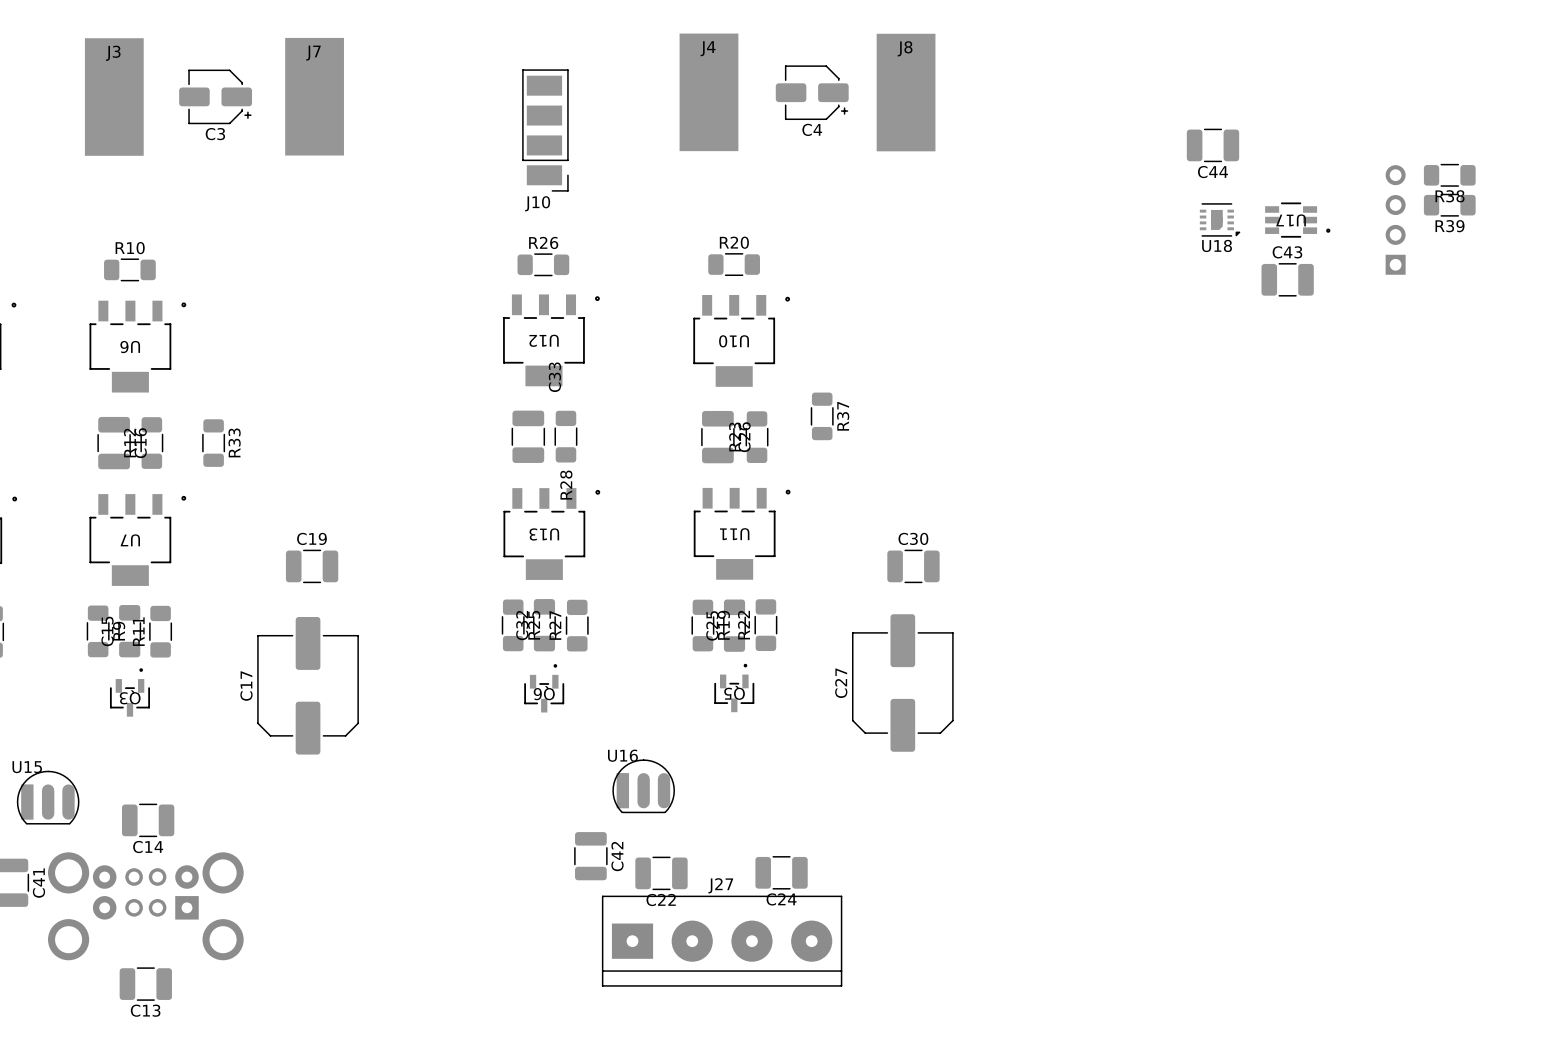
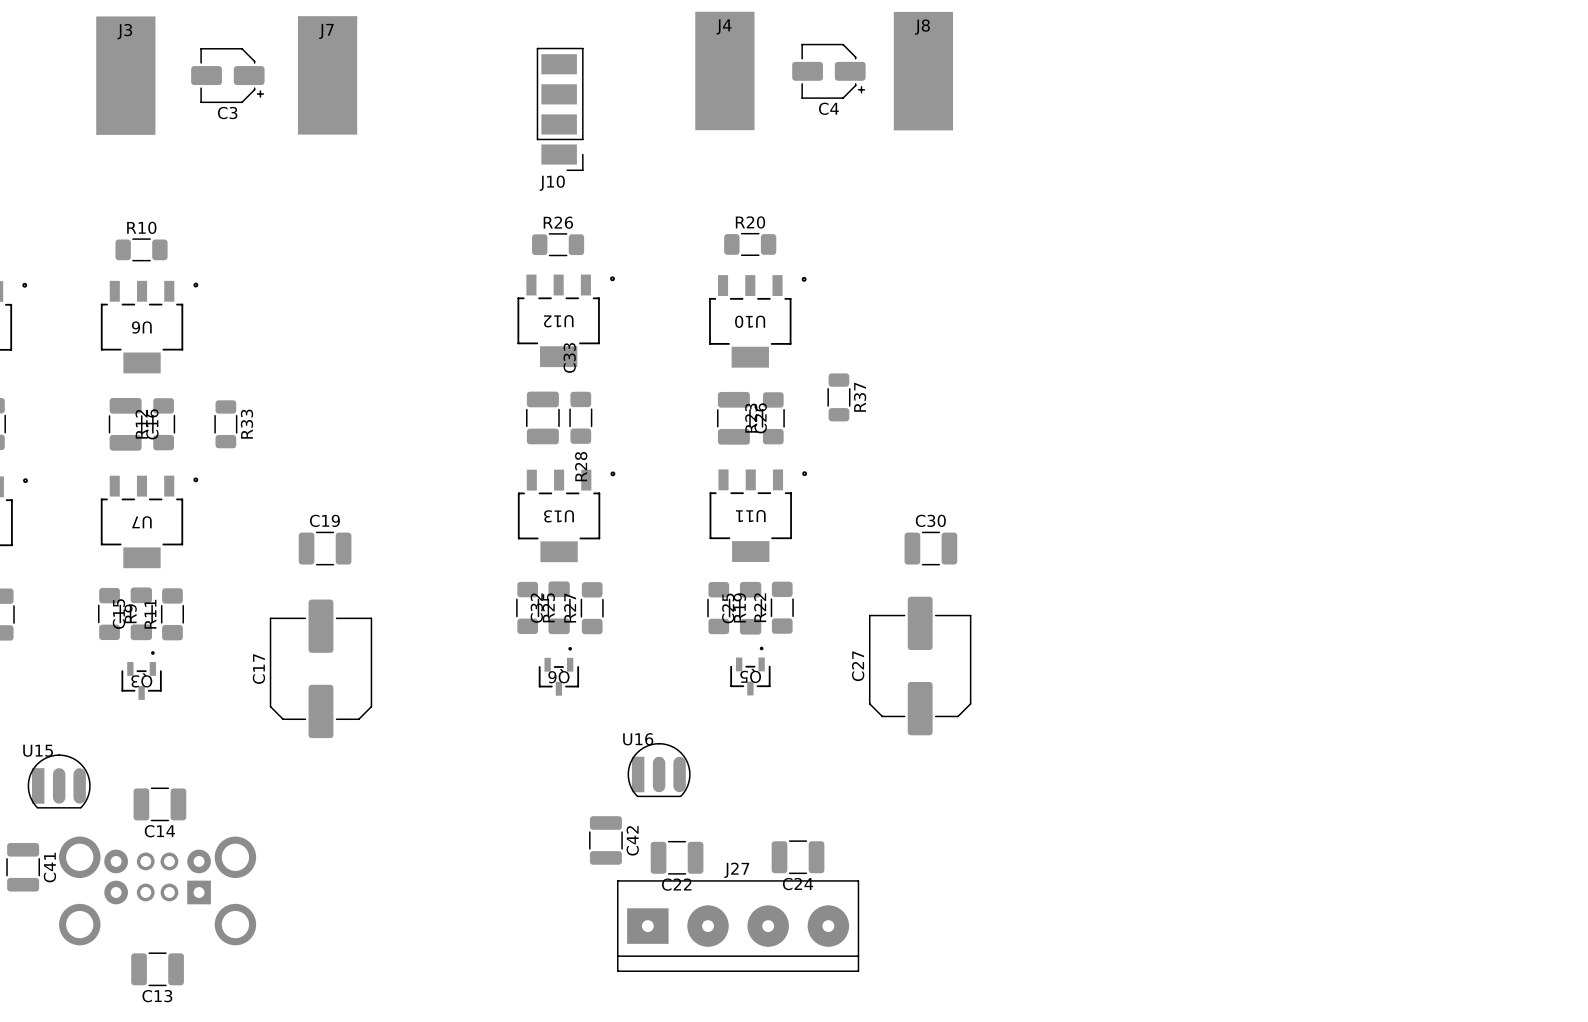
C44: (1212, 145) -> none
R38: (1449, 175) -> none
R39: (1449, 205) -> none
U18: (1220, 219) -> none
part: (1395, 219) -> none
U17: (1297, 220) -> none
C43: (1287, 279) -> none

